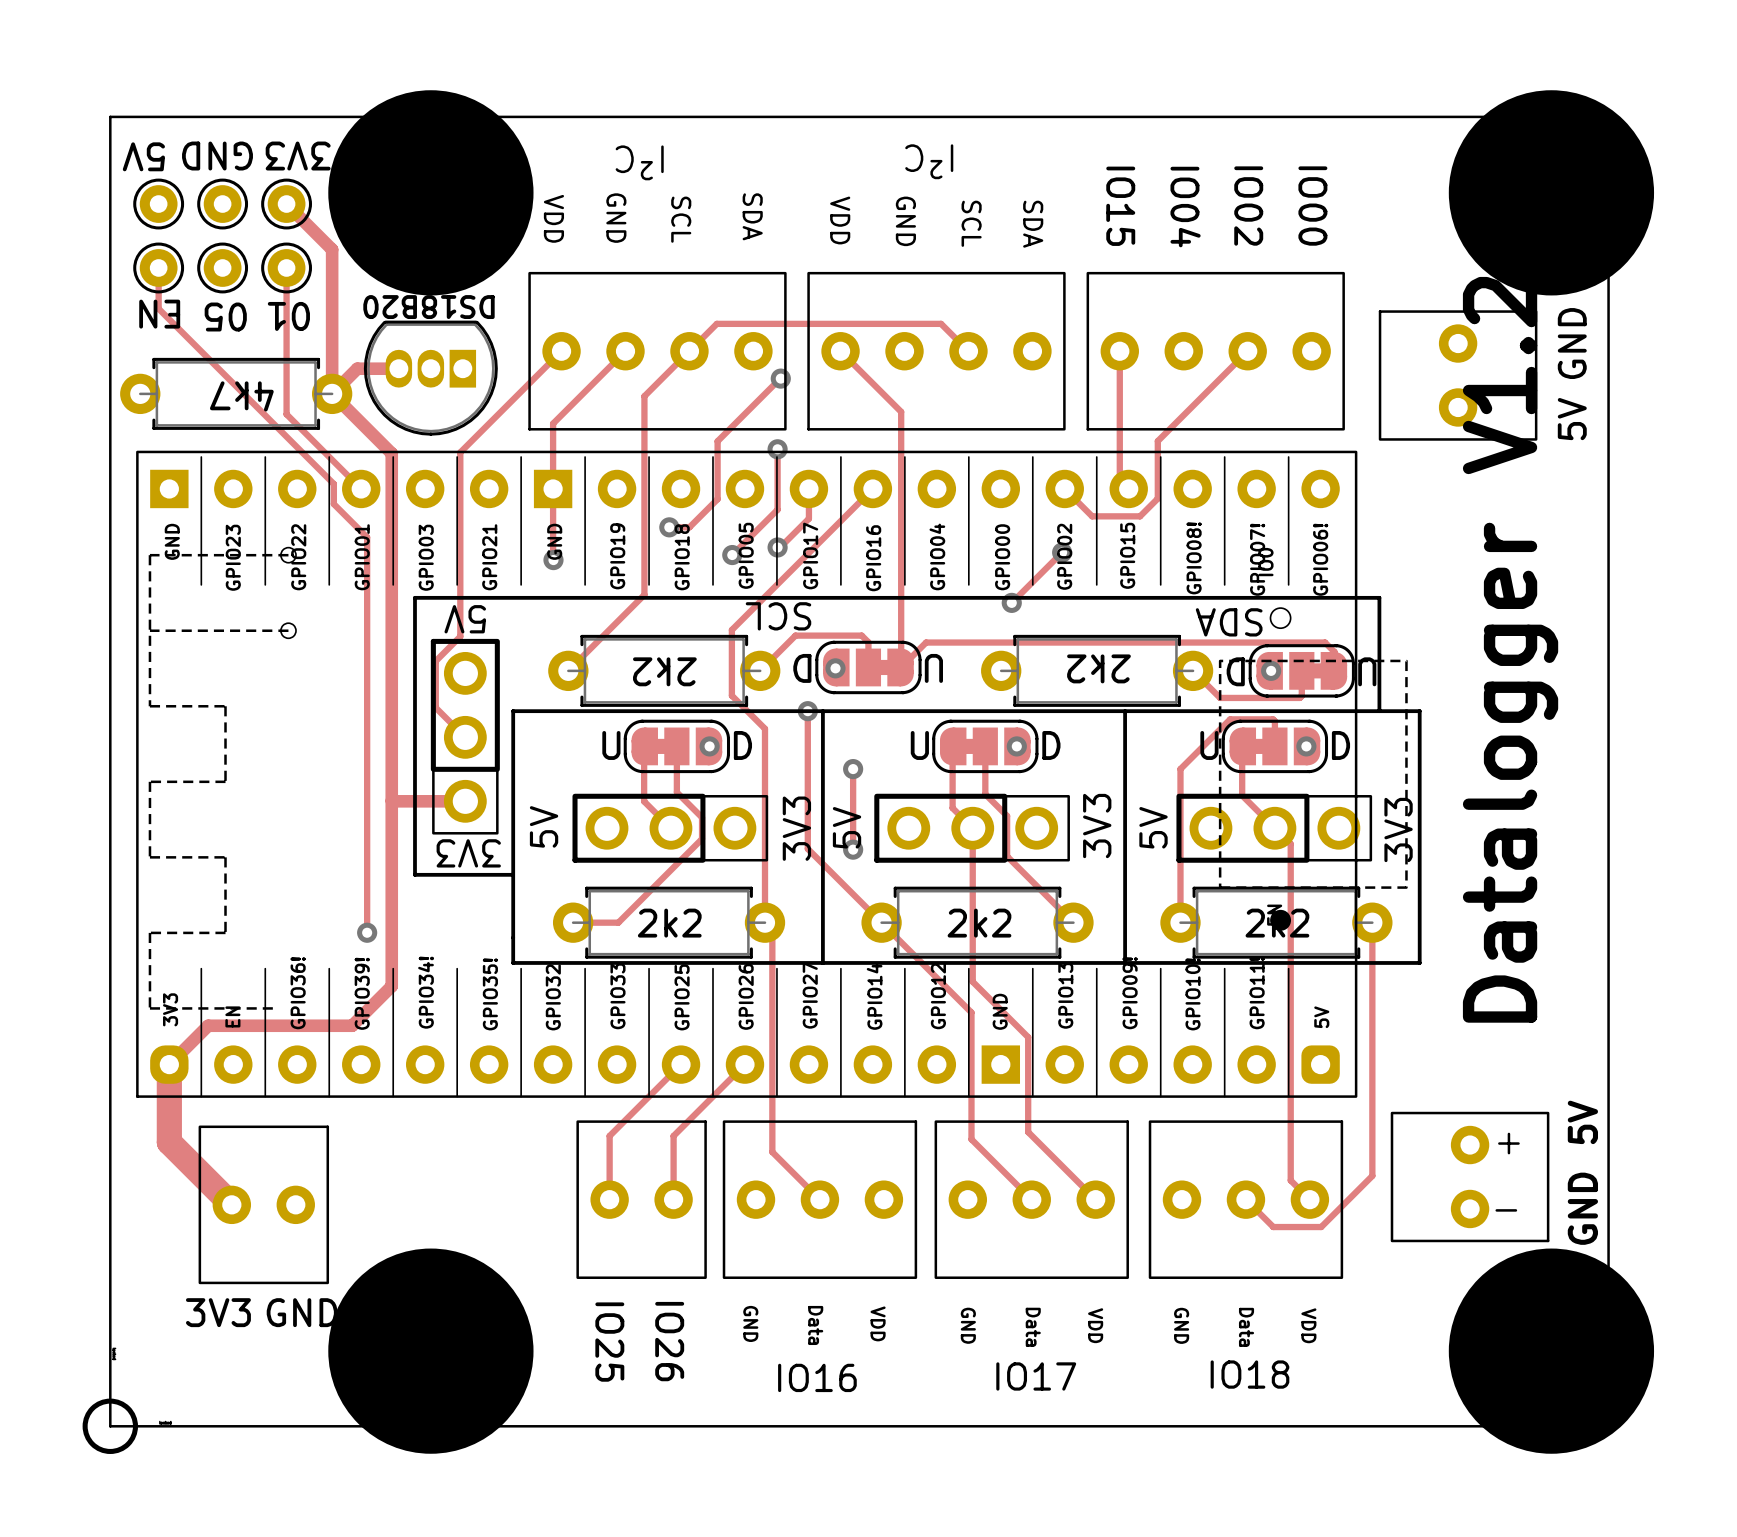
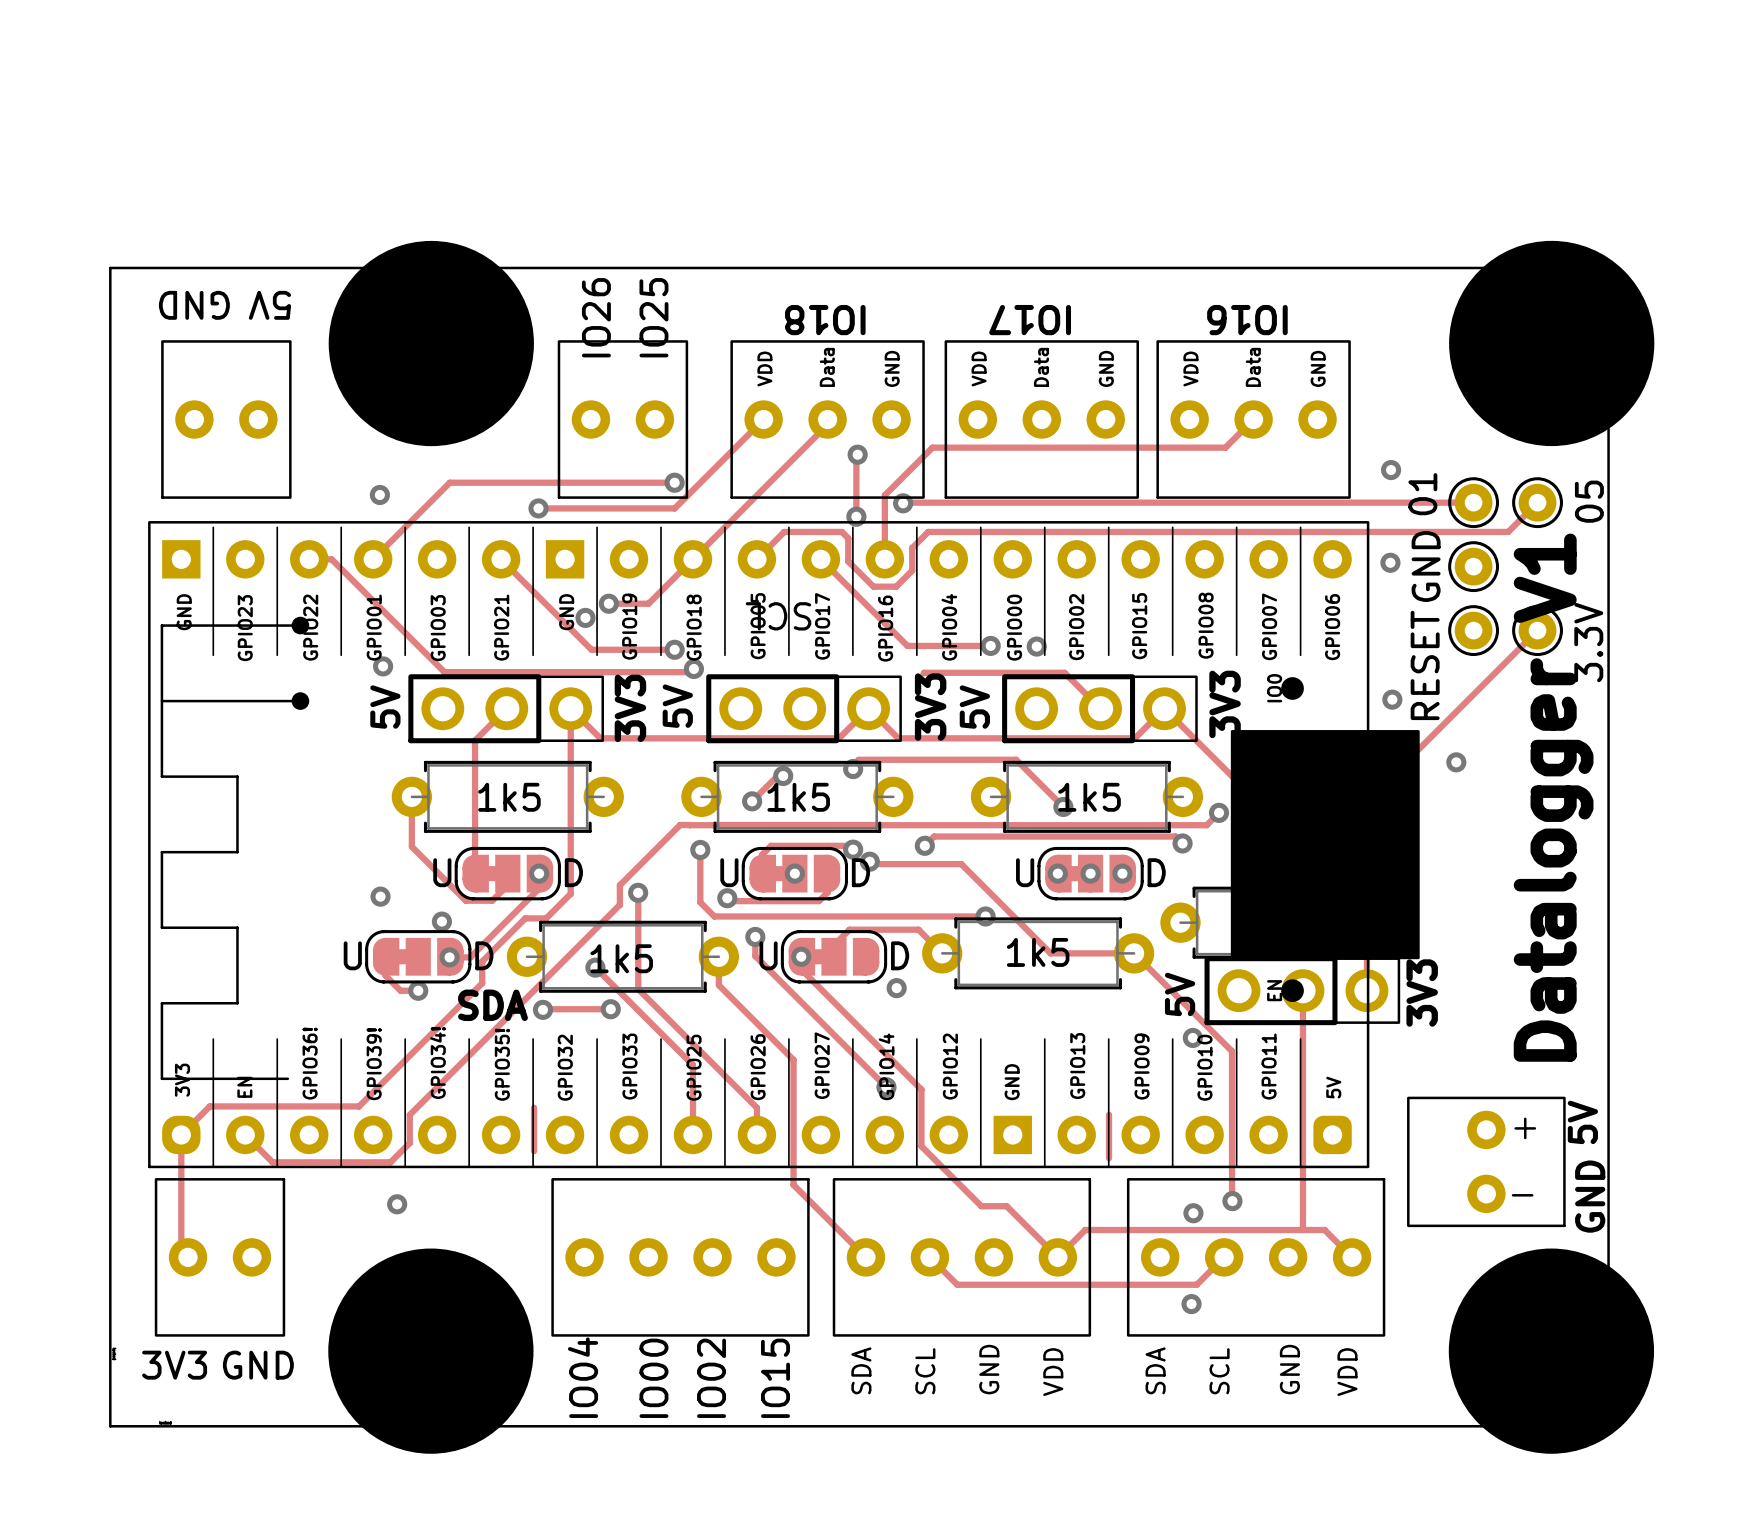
text: I²C (929, 161) -> none
text: I²C (639, 162) -> none
drawing position: (430, 192) -> (431, 343)
drawing position: (1551, 192) -> (1551, 343)
part: 5V (158, 204) -> none
part: GND (222, 204) -> none
track: (286, 204) (332, 249) (332, 393) -> none
part: 3V3 (286, 204) -> none
text: IO15 (1120, 206) -> none
text: IO02 (1248, 206) -> none
text: IO00 (1312, 206) -> none
text: IO04 (1185, 207) -> none
board edge: (110, 267) (110, 116) (1608, 116) (1608, 267) -> (110, 267) (1608, 267)
track: (158, 267) (158, 308) (333, 483) (333, 504) (367, 537) (367, 932) -> none
part: EN (158, 267) -> none
part: 05 (222, 267) -> none
track: (286, 267) (286, 414) (361, 488) -> none
part: 01 (286, 267) -> none
text: none -> GND (194, 305)
text: none -> 5V (269, 305)
text: none -> IO26 (596, 317)
text: none -> IO25 (653, 317)
text: none -> IO18 (825, 320)
text: none -> IO17 (1030, 320)
text: none -> IO16 (1247, 320)
text: GND (1572, 343) -> none
track: (561, 351) (460, 452) (460, 636) (435, 661) (435, 707) (465, 737) -> none
track: (625, 351) (553, 423) (553, 560) -> none
part: (657, 351) -> none
track: (840, 351) (901, 411) (901, 667) (926, 642) (1325, 642) (1334, 651) (1334, 670) -> none
part: (936, 351) -> none
track: (968, 351) (941, 323) (716, 323) (644, 396) (644, 594) (568, 670) -> none
track: (1119, 351) (1119, 480) (1128, 488) -> none
part: (1215, 351) -> none
track: (1247, 351) (1157, 441) (1157, 498) (1140, 516) (1092, 516) (1064, 488) -> none
track: (398, 368) (357, 368) (332, 393) -> none
part: (1458, 375) -> none
part: DS18B20 (430, 378) -> none
track: (780, 378) (717, 441) (717, 499) (689, 527) (669, 527) -> none
via: (780, 378) -> none
part: 4k7 (236, 393) -> none
track: (332, 393) (391, 453) (391, 986) (352, 1025) (208, 1025) (169, 1064) (169, 1142) (231, 1204) (226, 1204) -> none
part: none -> (226, 419)
part: none -> (622, 419)
track: none -> (763, 419) (674, 508) (538, 508)
track: none -> (827, 419) (827, 424) (648, 603) (608, 603)
part: none -> (827, 419)
part: none -> (1041, 419)
track: none -> (1253, 419) (1225, 447) (932, 447) (884, 495) (884, 559)
part: none -> (1253, 419)
text: 5V (1572, 419) -> none
track: (777, 449) (777, 509) (732, 555) -> none
via: (777, 449) -> none
track: none -> (857, 454) (856, 516)
via: none -> (857, 454)
via: none -> (1391, 470)
track: none -> (674, 482) (449, 482) (373, 559)
track: (808, 488) (808, 518) (780, 547) (777, 547) -> none
track: (872, 488) (731, 629) (731, 695) (765, 728) (765, 922) (772, 930) (772, 1152) (819, 1199) -> none
via: none -> (379, 494)
track: none -> (1473, 502) (903, 503)
part: none -> 01 (1473, 502)
track: none -> (1537, 502) (1508, 531) (928, 531) (912, 547) (912, 570) (896, 586) (873, 586) (848, 561) (848, 538) (841, 531) (784, 531) (756, 559)
part: none -> 05 (1537, 502)
via: none -> (903, 503)
via: none -> (538, 508)
via: none -> (856, 516)
via position: (669, 527) -> (674, 482)
via: (777, 547) -> none
track: (1062, 552) (1011, 602) -> none
via: (1062, 552) -> none
via: (732, 555) -> none
track: none -> (309, 559) (331, 559) (444, 672) (690, 672) (693, 668)
track: none -> (501, 559) (591, 649) (674, 649)
track: none -> (820, 559) (907, 645) (990, 645)
via: (553, 560) -> none
via: none -> (1390, 562)
part: none -> GND (1473, 566)
via: (1011, 602) -> none
via: none -> (608, 603)
via: none -> (585, 617)
text: 5V (465, 619) -> none
text: SDA (1229, 622) -> none
part: none -> RESET (1473, 630)
track: none -> (1537, 630) (1311, 856)
part: none -> 3.3V (1537, 630)
via: none -> (990, 645)
via: none -> (1036, 646)
via: none -> (674, 649)
text: Datalogger V1.2 (1510, 649) -> Datalogger V1 (1553, 797)
via: none -> (383, 666)
track: (868, 667) (868, 642) (861, 635) (795, 635) (760, 670) -> none
part: (868, 667) -> none
via: none -> (693, 668)
via: (835, 668) -> none
part: 2k2 (664, 670) -> none
part: 2k2 (1097, 670) -> none
track: (1193, 670) (1220, 697) (1299, 697) (1301, 696) (1301, 670) -> none
via: (1271, 670) -> none
part: (1301, 670) -> none
track: none -> (923, 673) (1064, 672) (1100, 708)
via: none -> (1392, 699)
text: none -> 3V3 (1225, 704)
text: none -> 5V (677, 706)
text: none -> 5V (385, 707)
text: none -> 3V3 (930, 707)
text: none -> 5V (974, 707)
track: none -> (506, 708) (475, 740) (475, 873)
text: none -> 3V3 (630, 708)
part: none -> (804, 708)
part: none -> (1099, 708)
line: (513, 711) (513, 962) (1419, 962) (1419, 711) (513, 711) -> none
track: (807, 711) (807, 848) (971, 1012) (971, 1139) (1031, 1199) -> none
via: (807, 711) -> none
line: (822, 711) (822, 962) -> none
line: (1125, 711) (1125, 962) -> none
line: (1379, 711) (1379, 597) (414, 597) (414, 874) (513, 874) -> none
part rotation: 0° (465, 736) -> 90° counterclockwise (506, 708)
track: (644, 746) (644, 801) (670, 828) -> none
track: (676, 746) (676, 792) (702, 817) (702, 838) (618, 922) (573, 922) -> none
part: (676, 746) -> none
via: (709, 746) -> none
track: (952, 746) (952, 808) (972, 828) (972, 981) (1028, 1037) (1028, 1132) (1095, 1199) -> none
track: (985, 746) (985, 794) (1007, 815) (1007, 856) (1073, 922) -> none
part: (985, 746) -> none
via: (1016, 746) -> none
track: (1242, 746) (1242, 795) (1290, 844) (1290, 1180) (1309, 1199) -> none
track: (1274, 746) (1274, 721) (1273, 719) (1230, 719) (1180, 769) (1180, 922) -> none
part: (1274, 746) -> none
via: (1306, 746) -> none
track: none -> (858, 759) (1016, 759) (1063, 806)
via: none -> (1456, 762)
track: (853, 769) (853, 849) -> none
part: (771, 774) -> none
track: none -> (783, 776) (777, 776) (752, 801)
via: none -> (783, 776)
track: none -> (411, 796) (411, 846) (465, 900) (492, 900) (507, 885) (507, 873)
part: none -> 1k5 (507, 796)
part: none -> 1k5 (797, 796)
part: none -> 1k5 (1086, 796)
track: (392, 801) (465, 801) -> none
via: none -> (752, 801)
via: none -> (1063, 806)
track: none -> (1219, 812) (1206, 825) (881, 825)
via: none -> (1219, 812)
track: none -> (689, 825) (680, 825) (619, 885) (619, 904) (409, 1114) (409, 1143) (390, 1162) (272, 1162) (245, 1134)
track: none -> (689, 825) (713, 825)
track: none -> (713, 825) (881, 825)
text: 5V (544, 826) -> none
text: 3V3 (1097, 826) -> none
text: 5V (847, 827) -> none
text: 5V (1153, 827) -> none
part: (670, 828) -> none
text: 3V3 (796, 828) -> none
part: (972, 828) -> none
part: (1274, 828) -> none
text: 3V3 (1398, 829) -> none
track: none -> (850, 843) (848, 845) (771, 845) (762, 854) (762, 873)
track: none -> (1182, 843) (1175, 836) (934, 836) (924, 845)
via: none -> (1182, 843)
part: none -> (783, 844)
via: none -> (924, 845)
track: none -> (700, 849) (700, 902) (714, 916) (985, 916)
via: none -> (700, 849)
text: 3V3 (468, 853) -> none
track: none -> (869, 861) (872, 864) (961, 864) (1050, 953) (1134, 953) (1232, 1051) (1232, 1201)
via: none -> (869, 861)
part: none -> (507, 873)
track: none -> (539, 873) (539, 888) (470, 957) (449, 957)
via: none -> (539, 873)
part: none -> (794, 873)
via: none -> (794, 873)
track: none -> (827, 873) (827, 892) (818, 901) (730, 901) (727, 898)
via: none -> (1057, 873)
part: none -> (1090, 873)
via: none -> (1090, 873)
via: none -> (1122, 873)
track: none -> (638, 892) (638, 989) (756, 1107) (756, 1134)
via: none -> (638, 892)
via: none -> (380, 896)
via: none -> (727, 898)
via: none -> (985, 916)
via: none -> (441, 921)
part: 2k2 (669, 922) -> none
part: 2k2 (977, 922) -> none
track: (1372, 922) (1372, 1175) (1321, 1227) (1273, 1227) (1245, 1199) -> none
via: (367, 932) -> none
track: none -> (755, 936) (755, 956) (886, 1087)
via: none -> (755, 936)
track: none -> (942, 953) (918, 929) (849, 929) (834, 945) (834, 956)
part: none -> 1k5 (1038, 953)
track: none -> (385, 956) (385, 975) (400, 990) (418, 990)
part: none -> (418, 956)
part: none -> 1k5 (622, 956)
track: none -> (718, 956) (718, 985) (793, 1059) (793, 1184) (865, 1257)
track: none -> (801, 956) (801, 969) (921, 1089) (921, 1146) (981, 1206) (1006, 1206) (1057, 1257) (1085, 1230) (1324, 1230) (1352, 1257)
via: none -> (801, 956)
part: none -> (834, 956)
via: none -> (449, 957)
track: none -> (595, 967) (692, 1065) (692, 1134)
via: none -> (595, 967)
via: none -> (896, 988)
via: none -> (418, 990)
track: none -> (1302, 990) (1302, 1229)
part: none -> (1302, 990)
track: none -> (1366, 990) (1366, 911) (1164, 708) (1134, 738) (898, 738) (868, 708) (839, 738) (600, 738) (570, 708) (570, 893) (546, 918) (525, 918) (482, 961) (482, 983) (359, 1106) (209, 1106) (181, 1134) (181, 1250) (188, 1257)
text: none -> 3V3 (1422, 993)
text: none -> 5V (1180, 994)
text: none -> SDA (492, 1005)
via: none -> (542, 1009)
track: none -> (610, 1009) (542, 1009)
via: none -> (610, 1009)
via: none -> (1192, 1037)
track: (681, 1064) (609, 1135) (609, 1199) -> none
track: (744, 1064) (673, 1135) (673, 1199) -> none
via: none -> (886, 1087)
track: none -> (534, 1107) (534, 1151)
track: none -> (1109, 1114) (1109, 1158)
part position: (1470, 1177) -> (1486, 1161)
part: (641, 1199) -> none
part: (819, 1199) -> none
part: (1031, 1199) -> none
part: (1245, 1199) -> none
via: none -> (1232, 1201)
part position: (263, 1204) -> (219, 1257)
via: none -> (397, 1204)
text position: GND (1582, 1208) -> GND (1590, 1196)
via: none -> (1193, 1213)
part: none -> (680, 1257)
track: none -> (929, 1257) (957, 1284) (1196, 1284) (1224, 1257)
part: none -> (961, 1257)
part: none -> (1256, 1257)
via: none -> (1191, 1304)
text position: 3V3 (218, 1312) -> 3V3 (174, 1365)
text position: GND (302, 1312) -> GND (258, 1365)
text: IO26 (669, 1341) -> IO02 (711, 1378)
text: IO25 (609, 1342) -> none
text: IO18 (1249, 1374) -> none
text: IO17 (1036, 1376) -> none
text: none -> IO04 (583, 1377)
text: IO16 (817, 1377) -> IO15 (775, 1378)
text: none -> IO00 (653, 1378)
drawing: [82, 1398, 139, 1454] -> none

